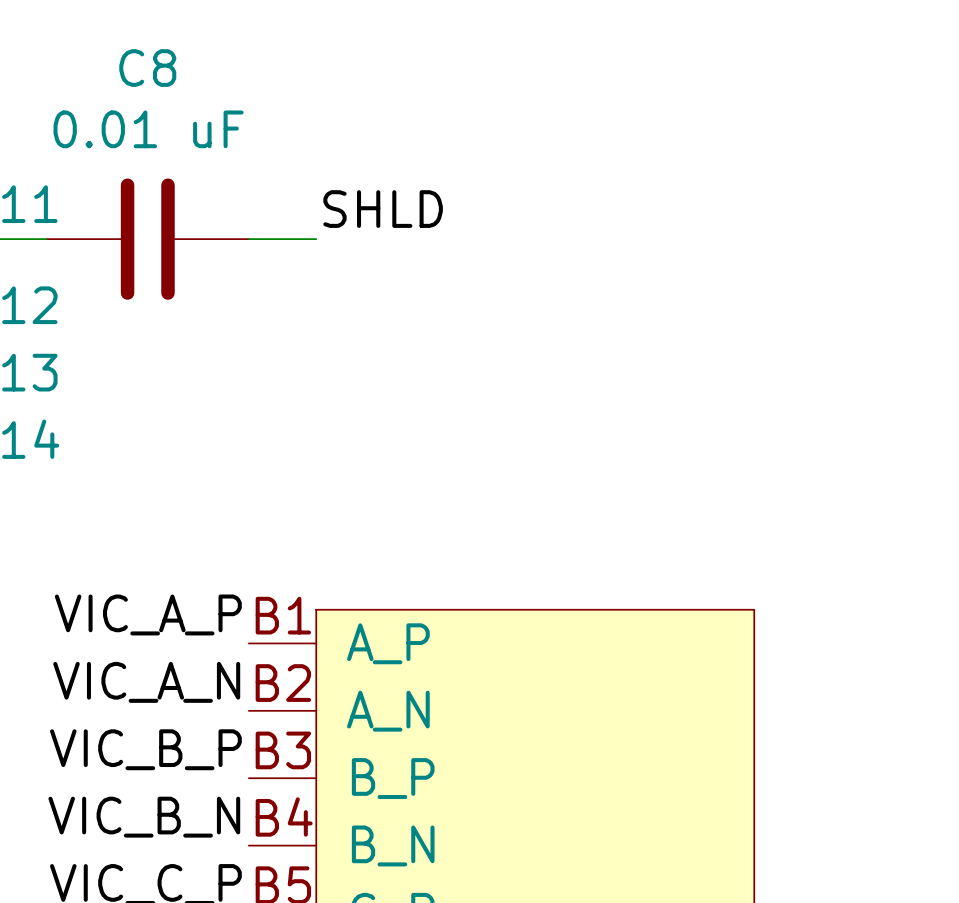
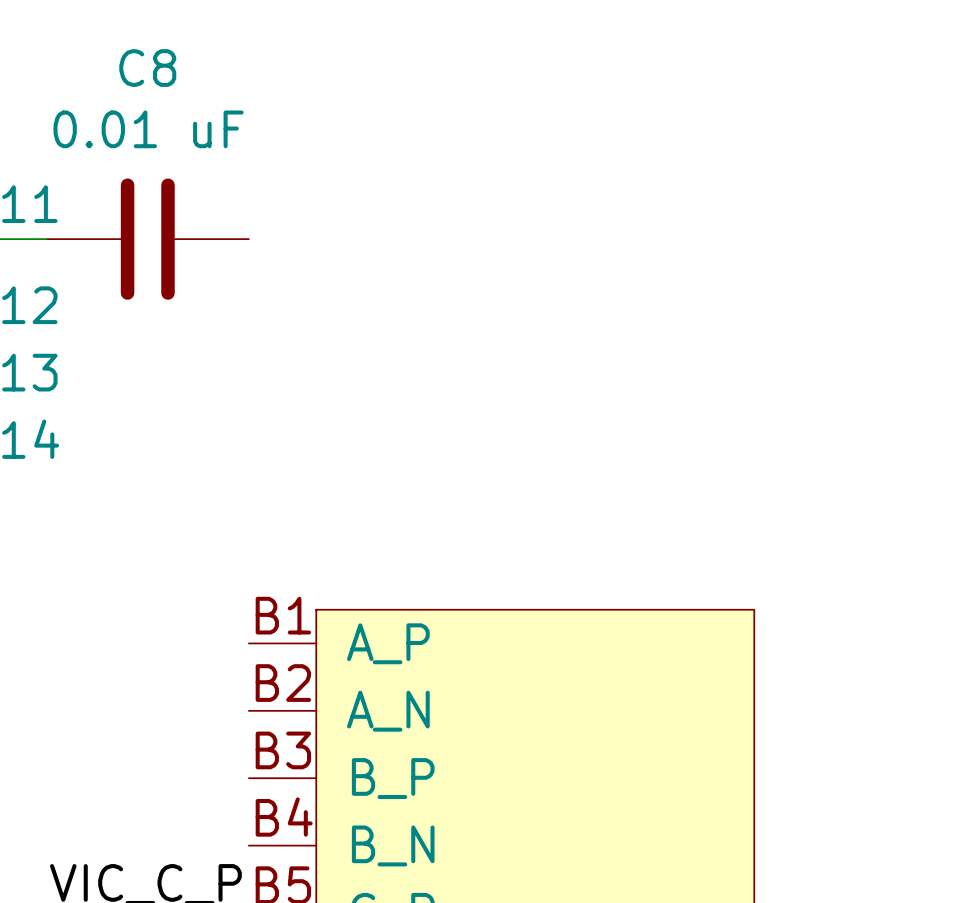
label: SHLD (383, 209) -> none
wire: (248, 239) (316, 239) -> none
label: VIC_A_P (148, 614) -> none
label: VIC_A_N (146, 682) -> none
label: VIC_B_P (145, 749) -> none
label: VIC_B_N (144, 817) -> none

